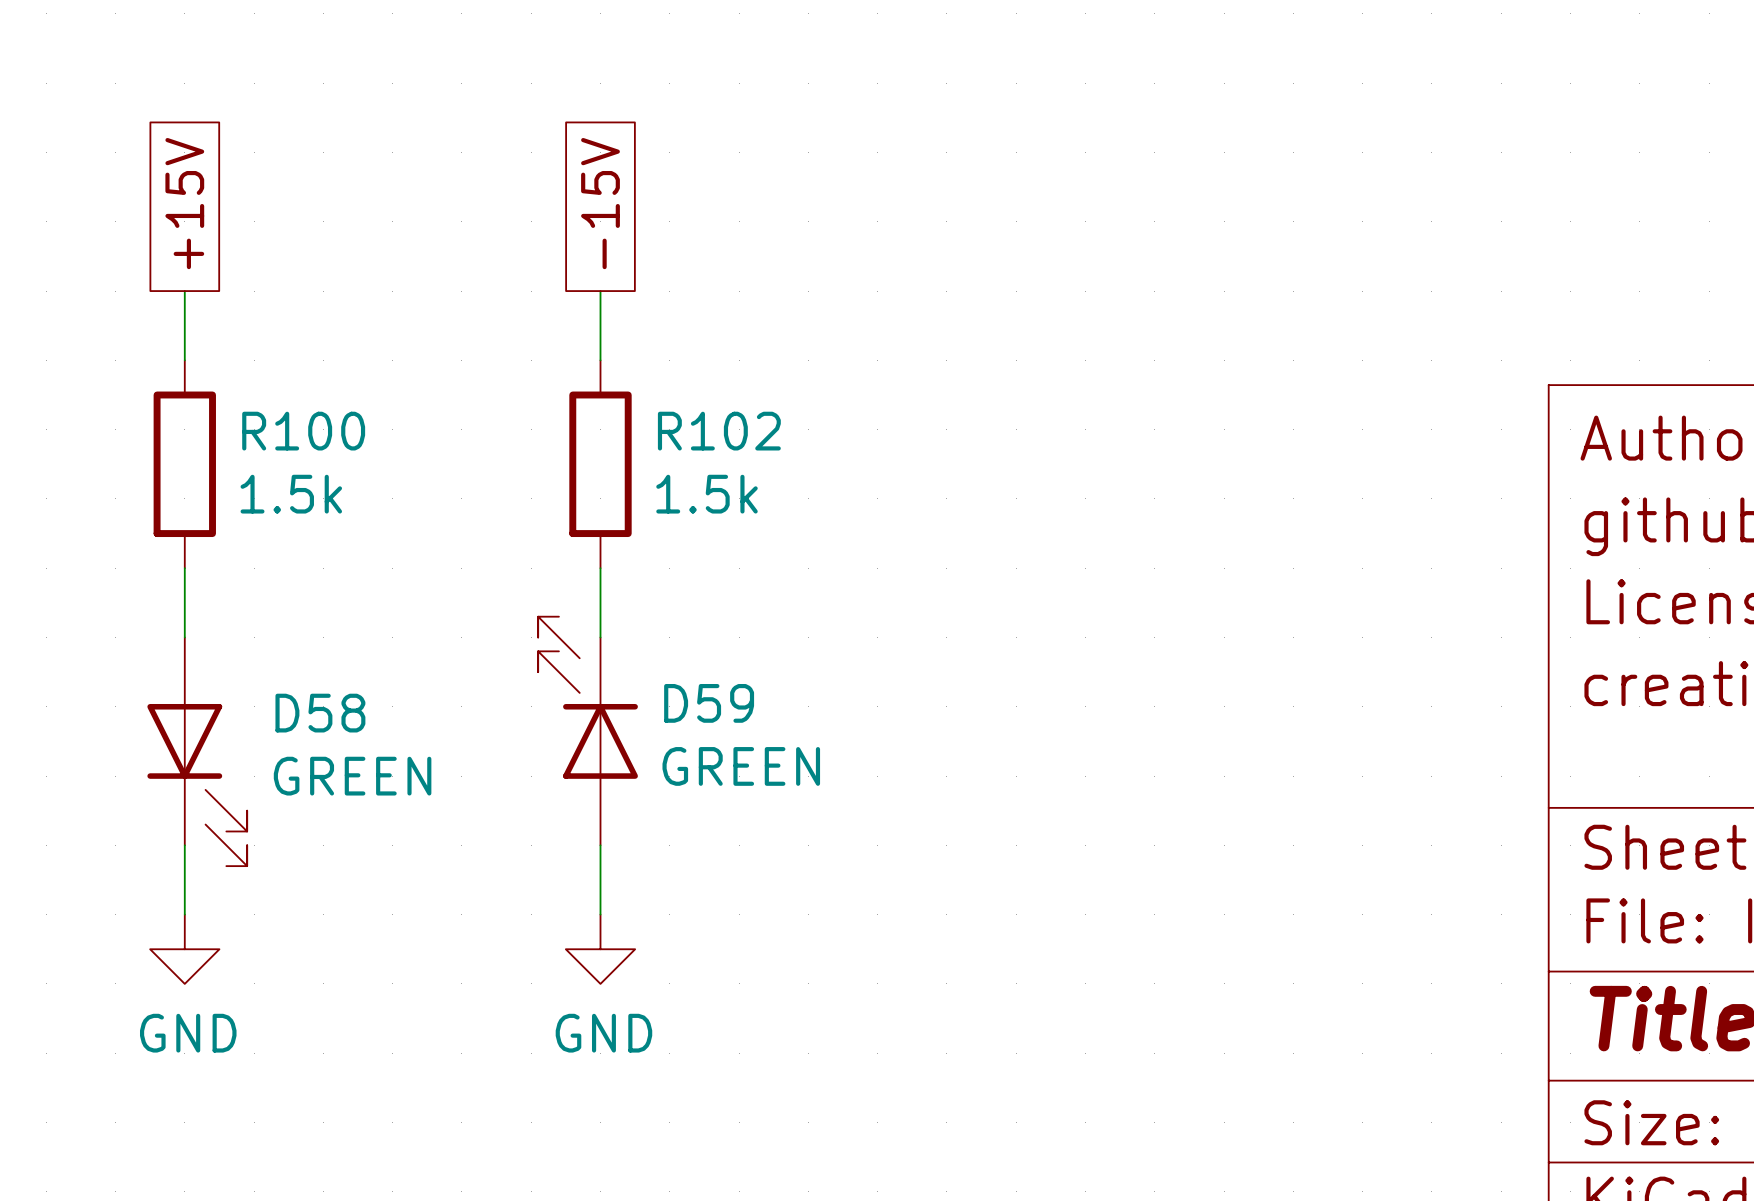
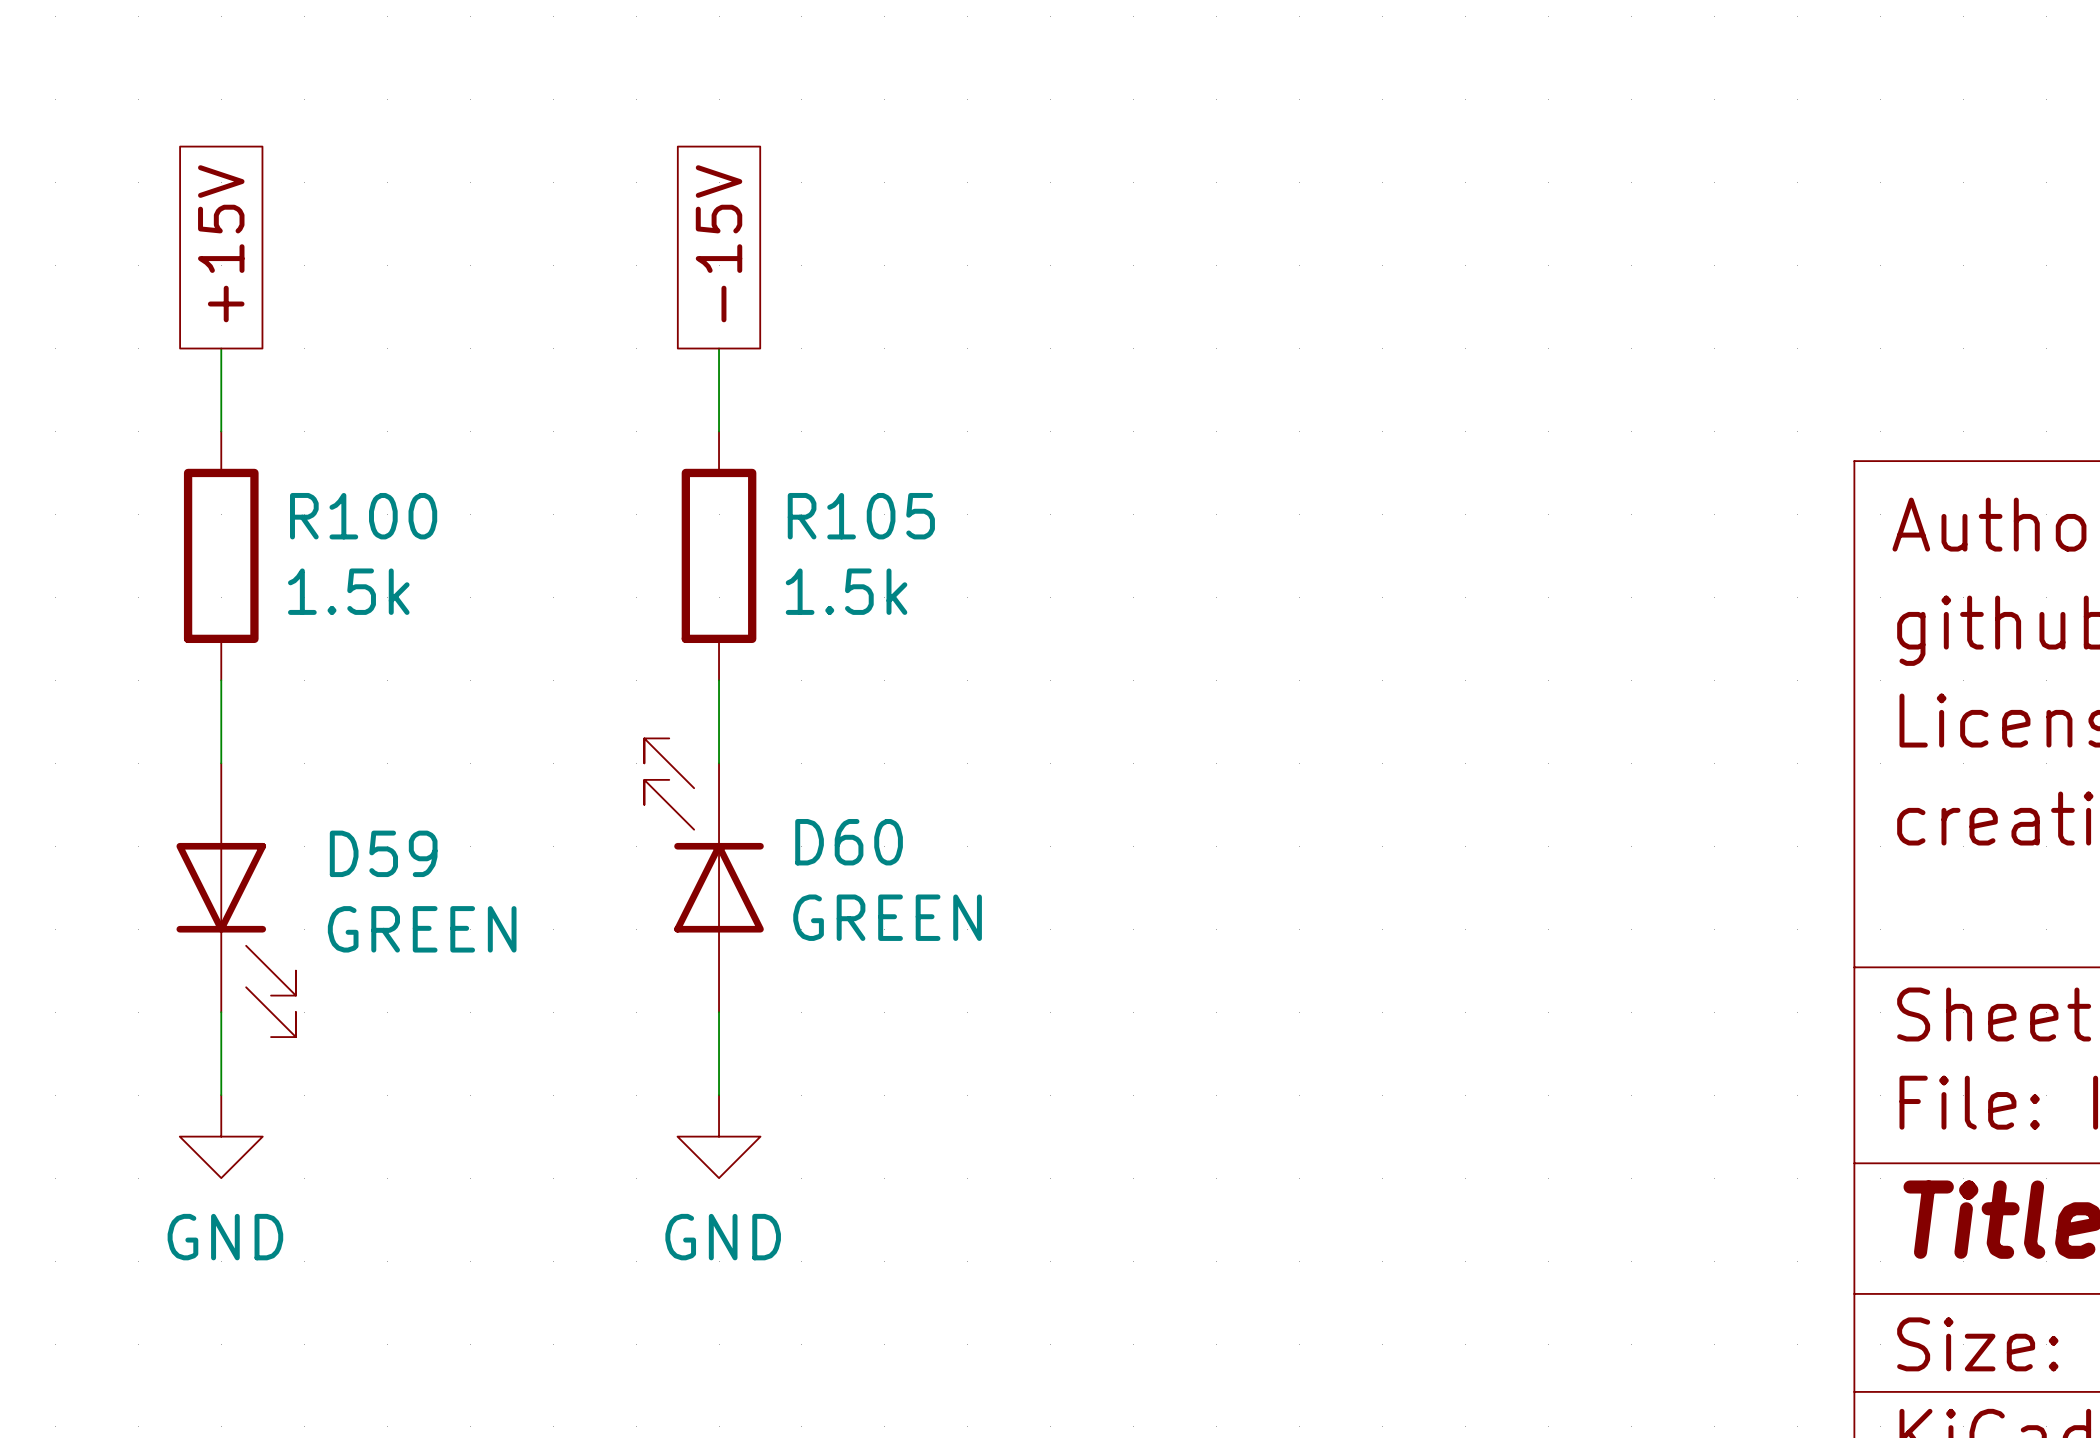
R102 name: R102 (719, 431) -> R105 (861, 516)
D59 name: D59 (709, 703) -> D60 (849, 842)
D58 name: D58 (320, 713) -> D59 (383, 853)

